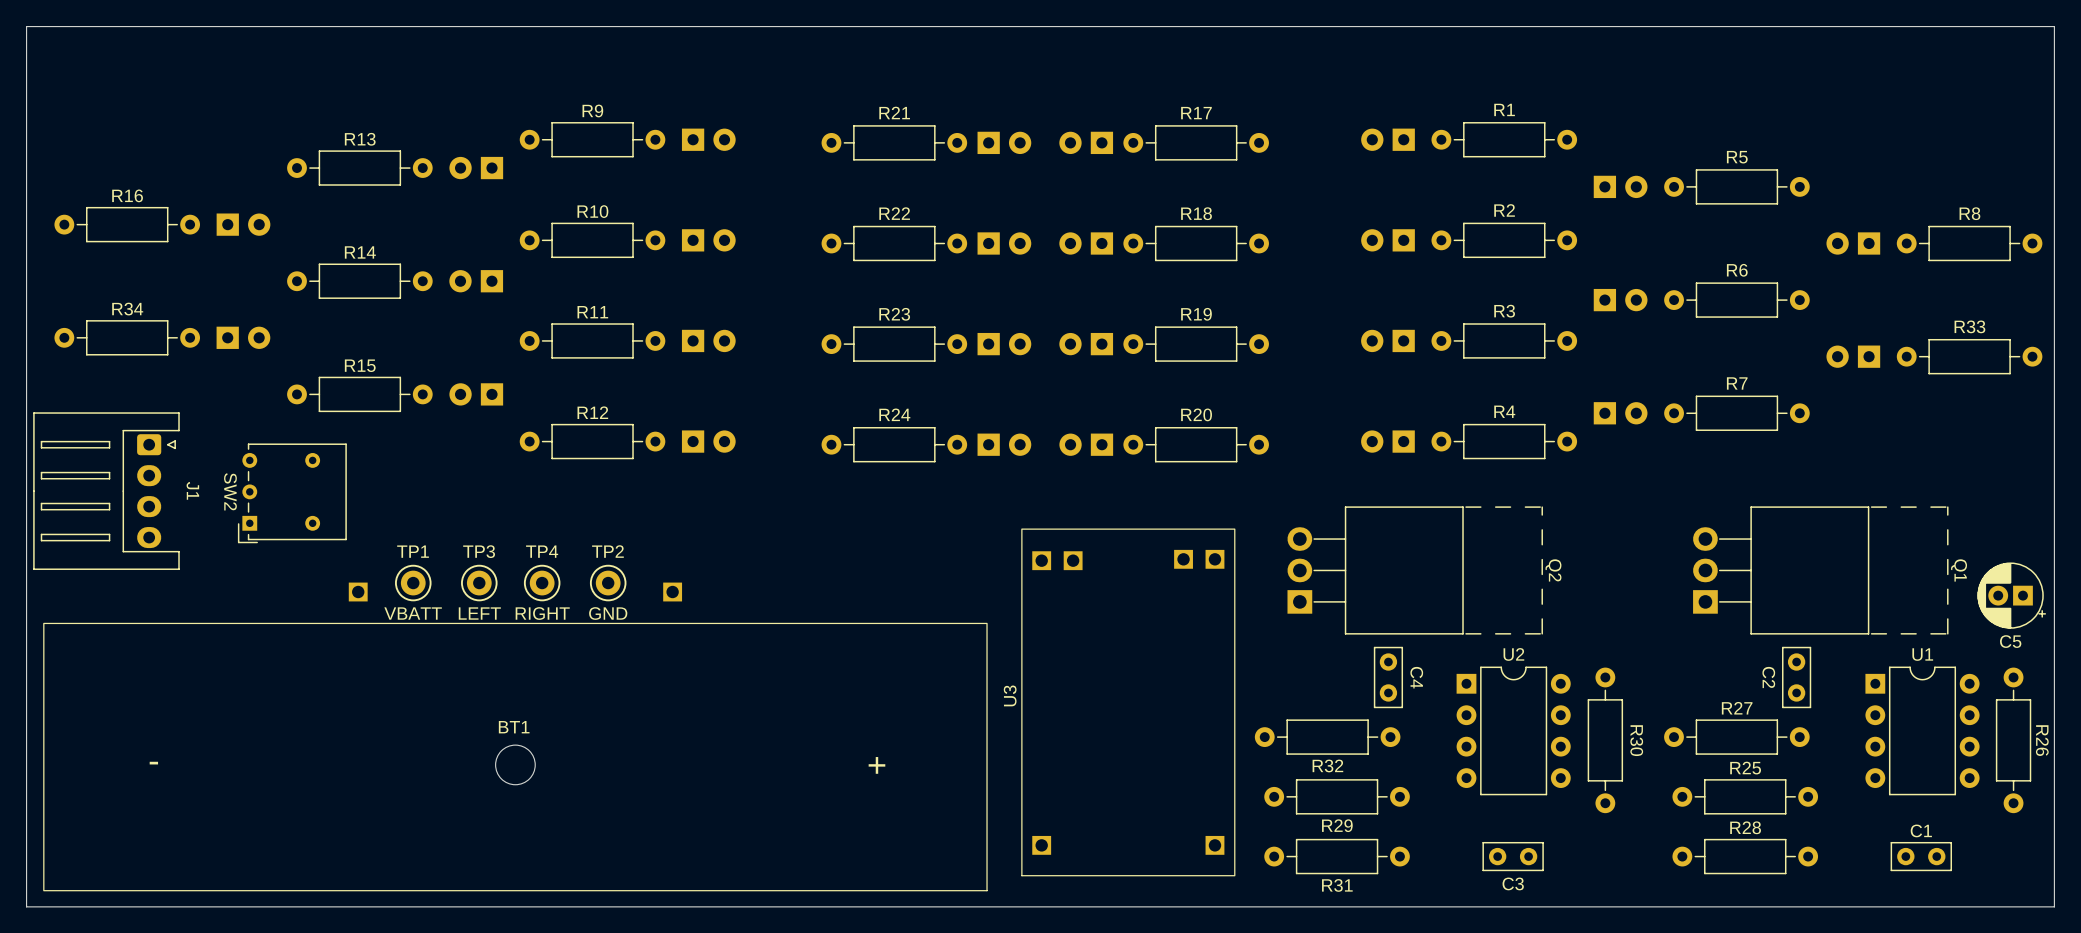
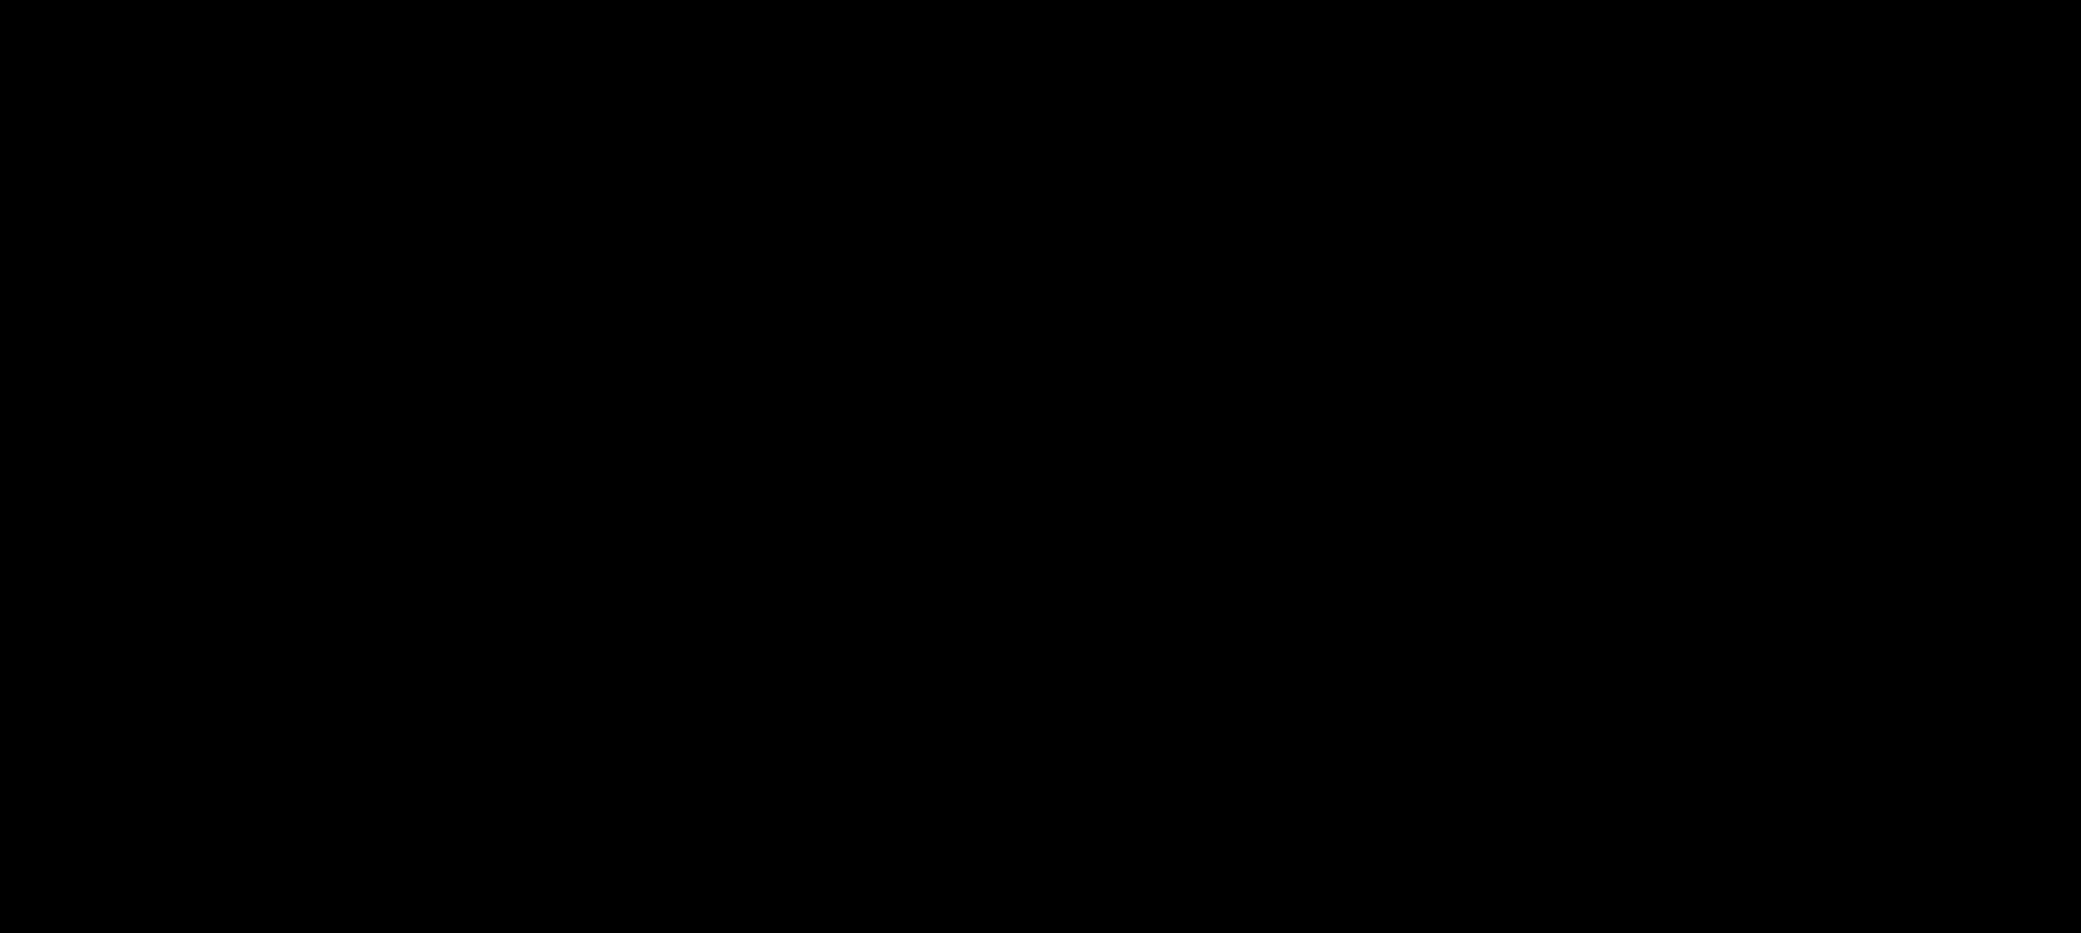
board edge: (2054, 26) (26, 26) (26, 906) (2054, 906) (2054, 26) -> none
R9: (592, 139) -> none
part: (708, 139) -> none
part: (1388, 139) -> none
R1: (1504, 139) -> none
R21: (894, 142) -> none
part: (1004, 142) -> none
part: (1086, 142) -> none
R17: (1196, 142) -> none
R13: (359, 168) -> none
part: (476, 168) -> none
part: (1620, 186) -> none
R5: (1736, 186) -> none
R16: (127, 224) -> none
part: (243, 224) -> none
R10: (592, 240) -> none
part: (708, 240) -> none
part: (1388, 240) -> none
R2: (1504, 240) -> none
R22: (894, 243) -> none
part: (1004, 243) -> none
part: (1086, 243) -> none
R18: (1196, 243) -> none
part: (1853, 243) -> none
R8: (1969, 243) -> none
R14: (359, 281) -> none
part: (476, 281) -> none
part: (1620, 300) -> none
R6: (1736, 300) -> none
R34: (127, 337) -> none
part: (243, 337) -> none
R11: (592, 340) -> none
part: (708, 340) -> none
part: (1387, 340) -> none
R3: (1504, 340) -> none
R23: (894, 344) -> none
part: (1004, 344) -> none
part: (1086, 344) -> none
R19: (1196, 344) -> none
part: (1853, 356) -> none
R33: (1969, 356) -> none
R15: (359, 394) -> none
part: (476, 394) -> none
part: (1620, 413) -> none
R7: (1736, 413) -> none
R12: (592, 441) -> none
part: (708, 441) -> none
part: (1387, 441) -> none
R4: (1504, 441) -> none
R24: (894, 444) -> none
part: (1004, 444) -> none
part: (1086, 444) -> none
R20: (1196, 444) -> none
J1: (106, 491) -> none
SW2: (292, 493) -> none
Q2: (1415, 570) -> none
Q1: (1820, 570) -> none
TP1: VBATT (413, 583) -> none
TP3: LEFT (479, 583) -> none
TP4: RIGHT (542, 583) -> none
TP2: GND (608, 583) -> none
C5: (2011, 595) -> none
C4: (1388, 677) -> none
C2: (1796, 677) -> none
U3: (1128, 702) -> none
U2: (1513, 730) -> none
U1: (1922, 730) -> none
BT1: (515, 736) -> none
R32: (1327, 737) -> none
R27: (1736, 737) -> none
R30: (1605, 740) -> none
R26: (2013, 740) -> none
R29: (1337, 796) -> none
R25: (1745, 796) -> none
R31: (1337, 856) -> none
C3: (1513, 856) -> none
R28: (1745, 856) -> none
C1: (1921, 856) -> none

